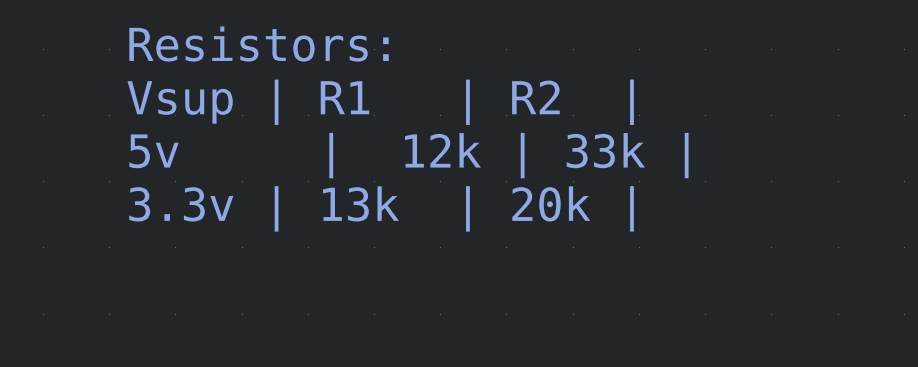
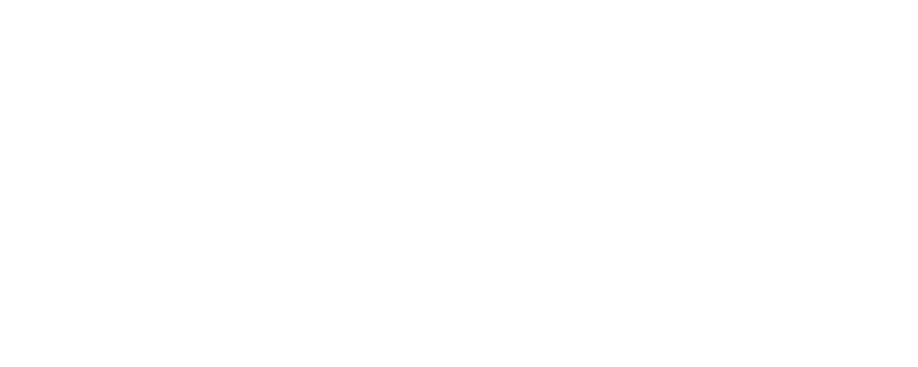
text: Resistors: (259, 44) -> none
text: Vsup | R1 | R2 | (380, 102) -> none
text: 5v | 12k | 33k | (408, 155) -> none
text: 3.3v | 13k | 20k | (381, 208) -> none

